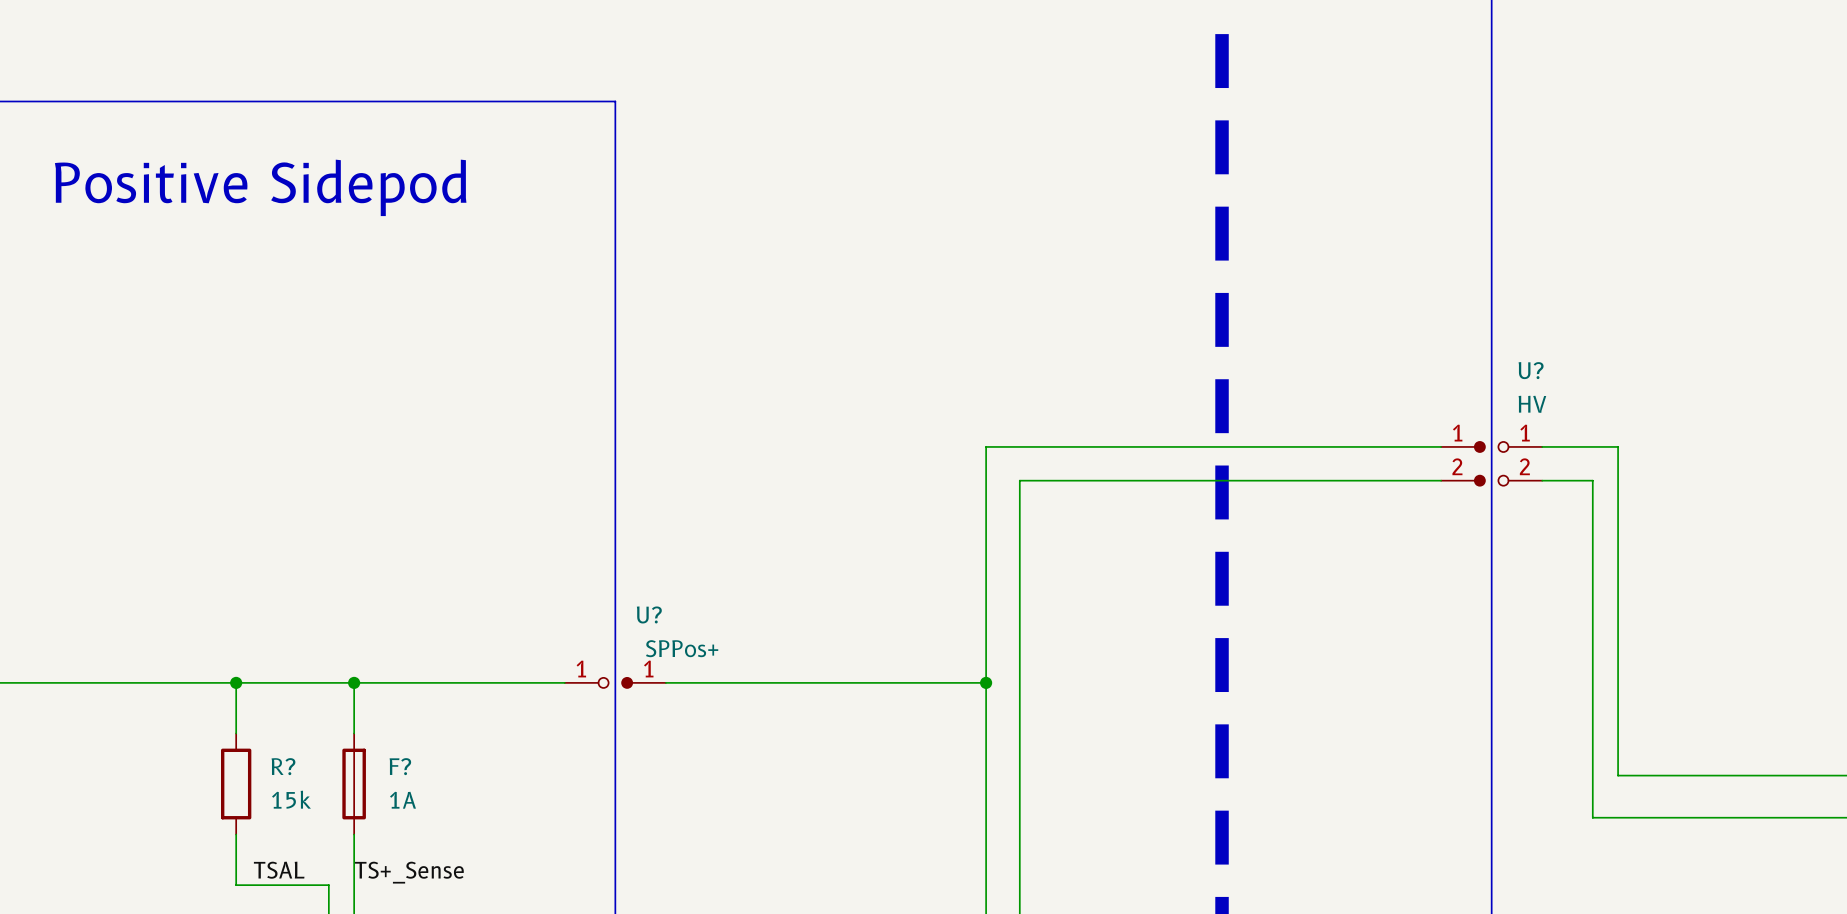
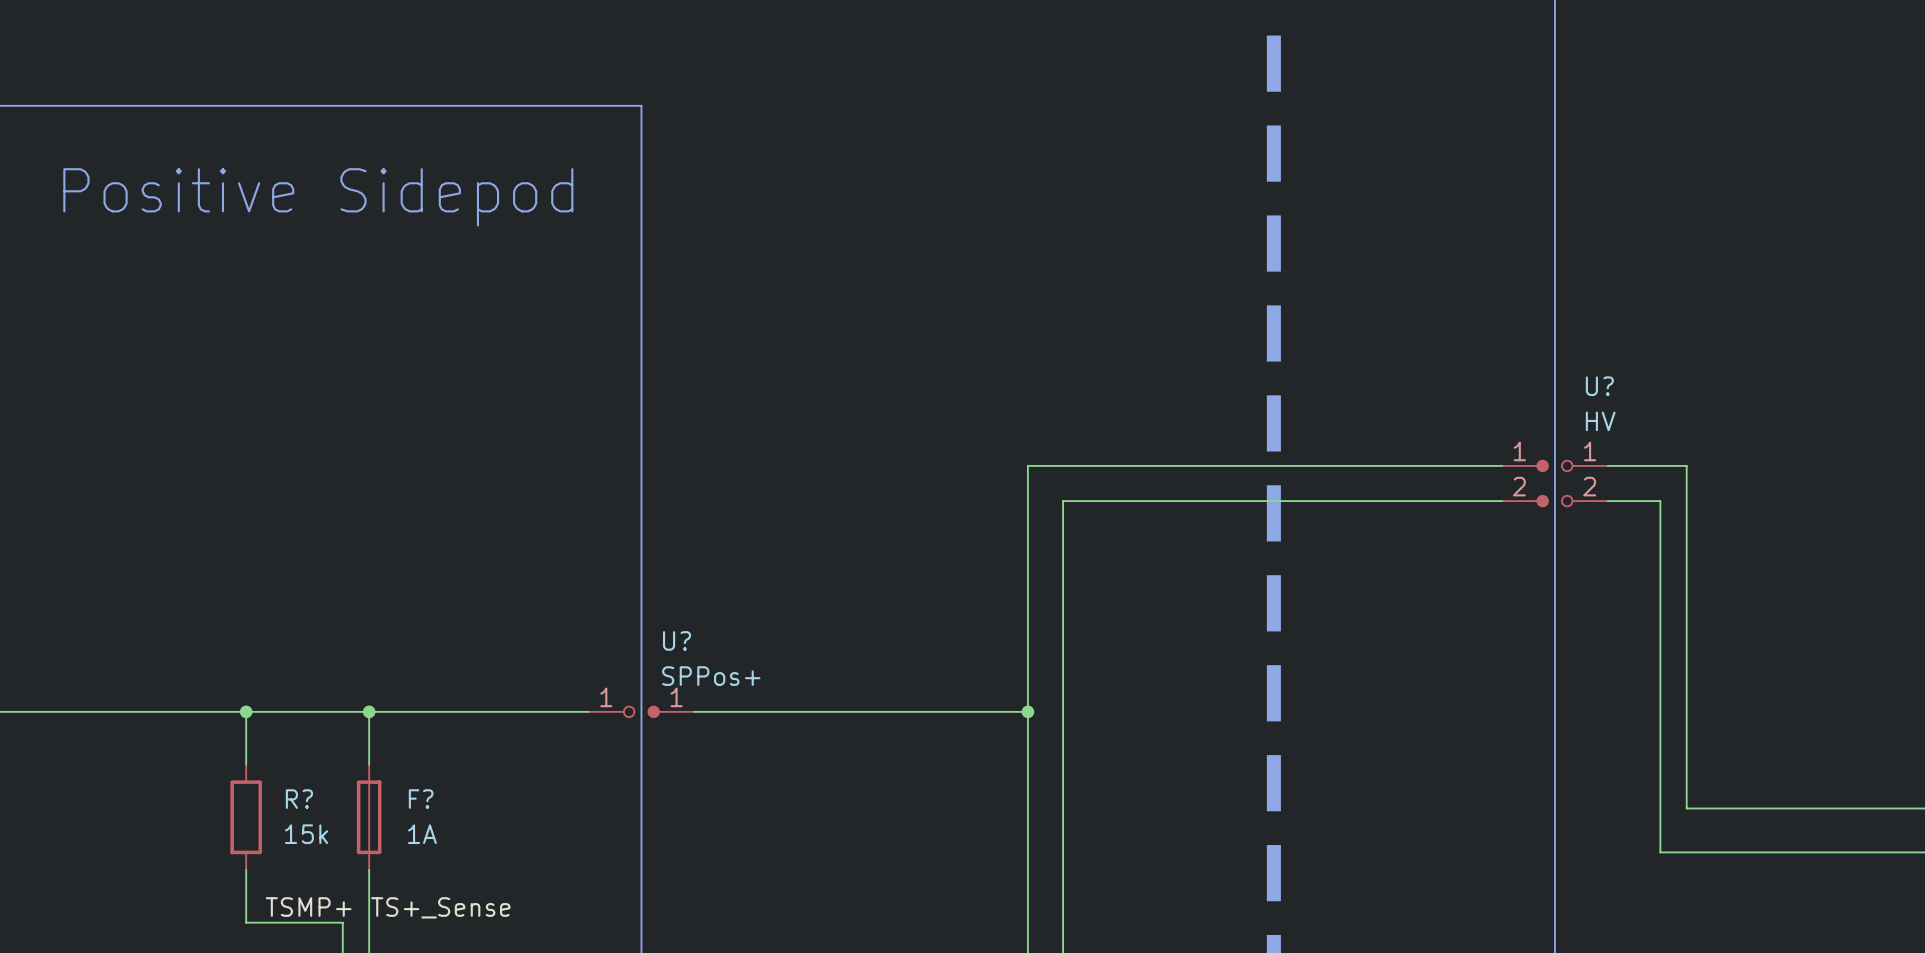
label: TSAL (279, 870) -> TSMP+ (308, 907)

